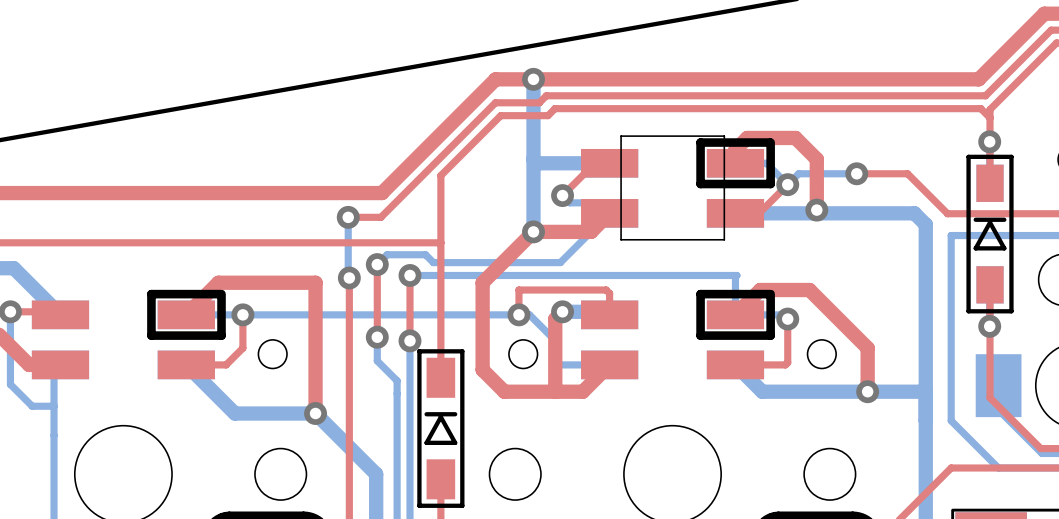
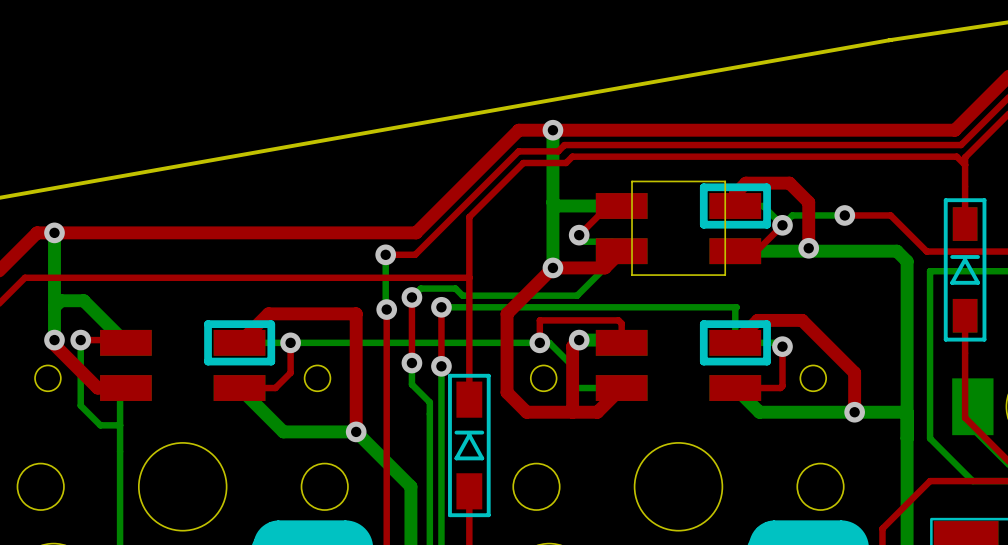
via: (989, 141) -> none
via: (989, 326) -> none

